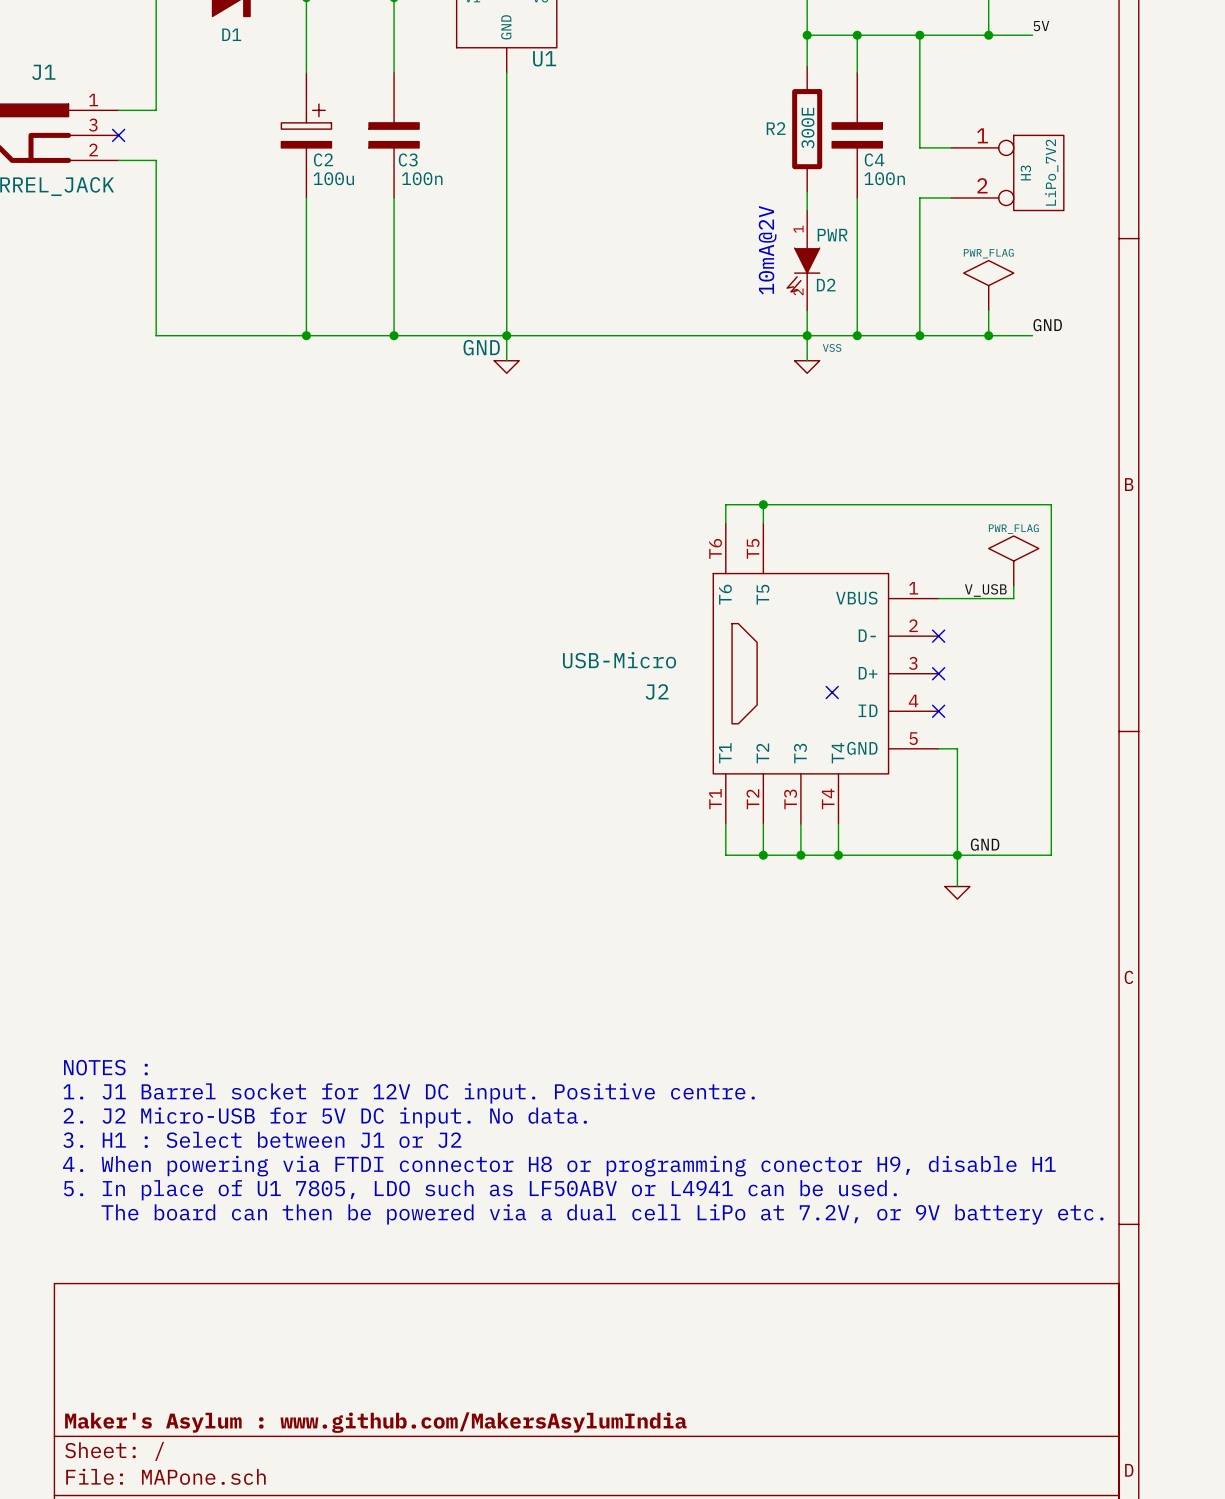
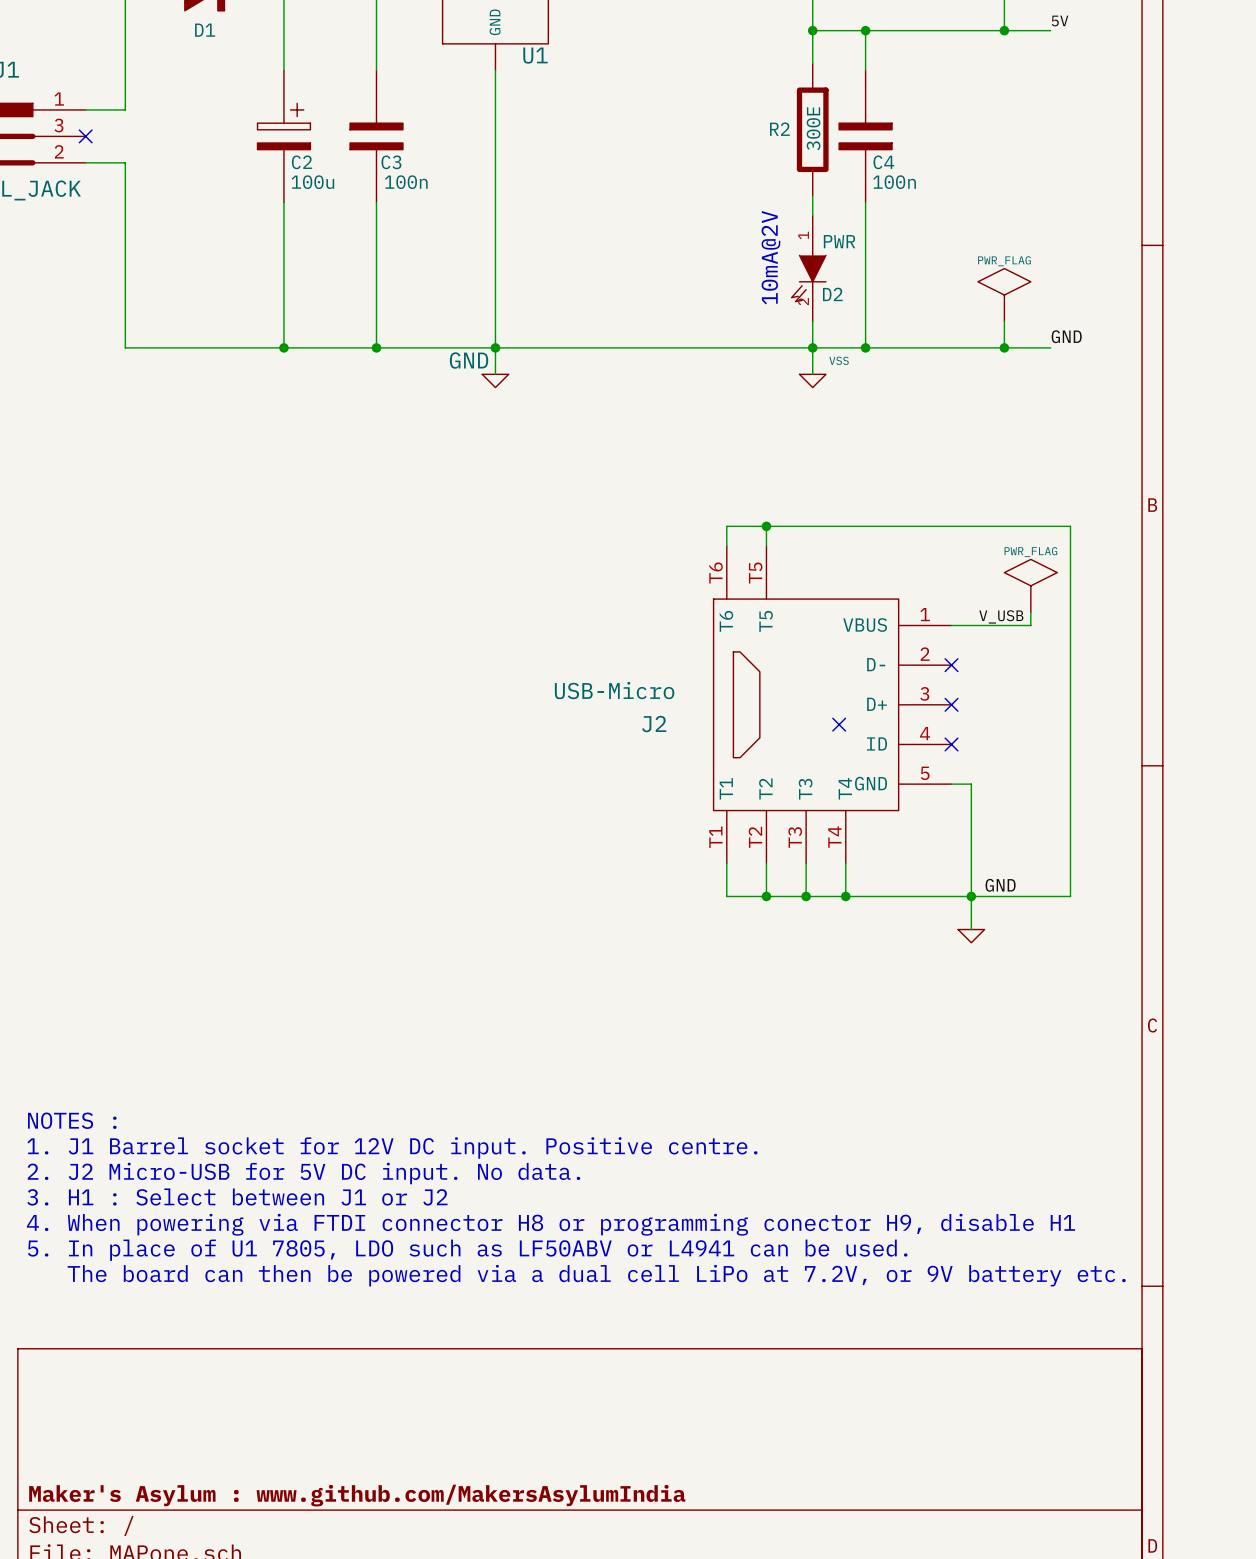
wire: (919, 35) (919, 147) (951, 147) -> none
junction: (919, 35) -> none
H3: LiPo_7V2 (1007, 172) -> none
wire: (951, 197) (919, 197) (919, 335) -> none
junction: (919, 335) -> none

